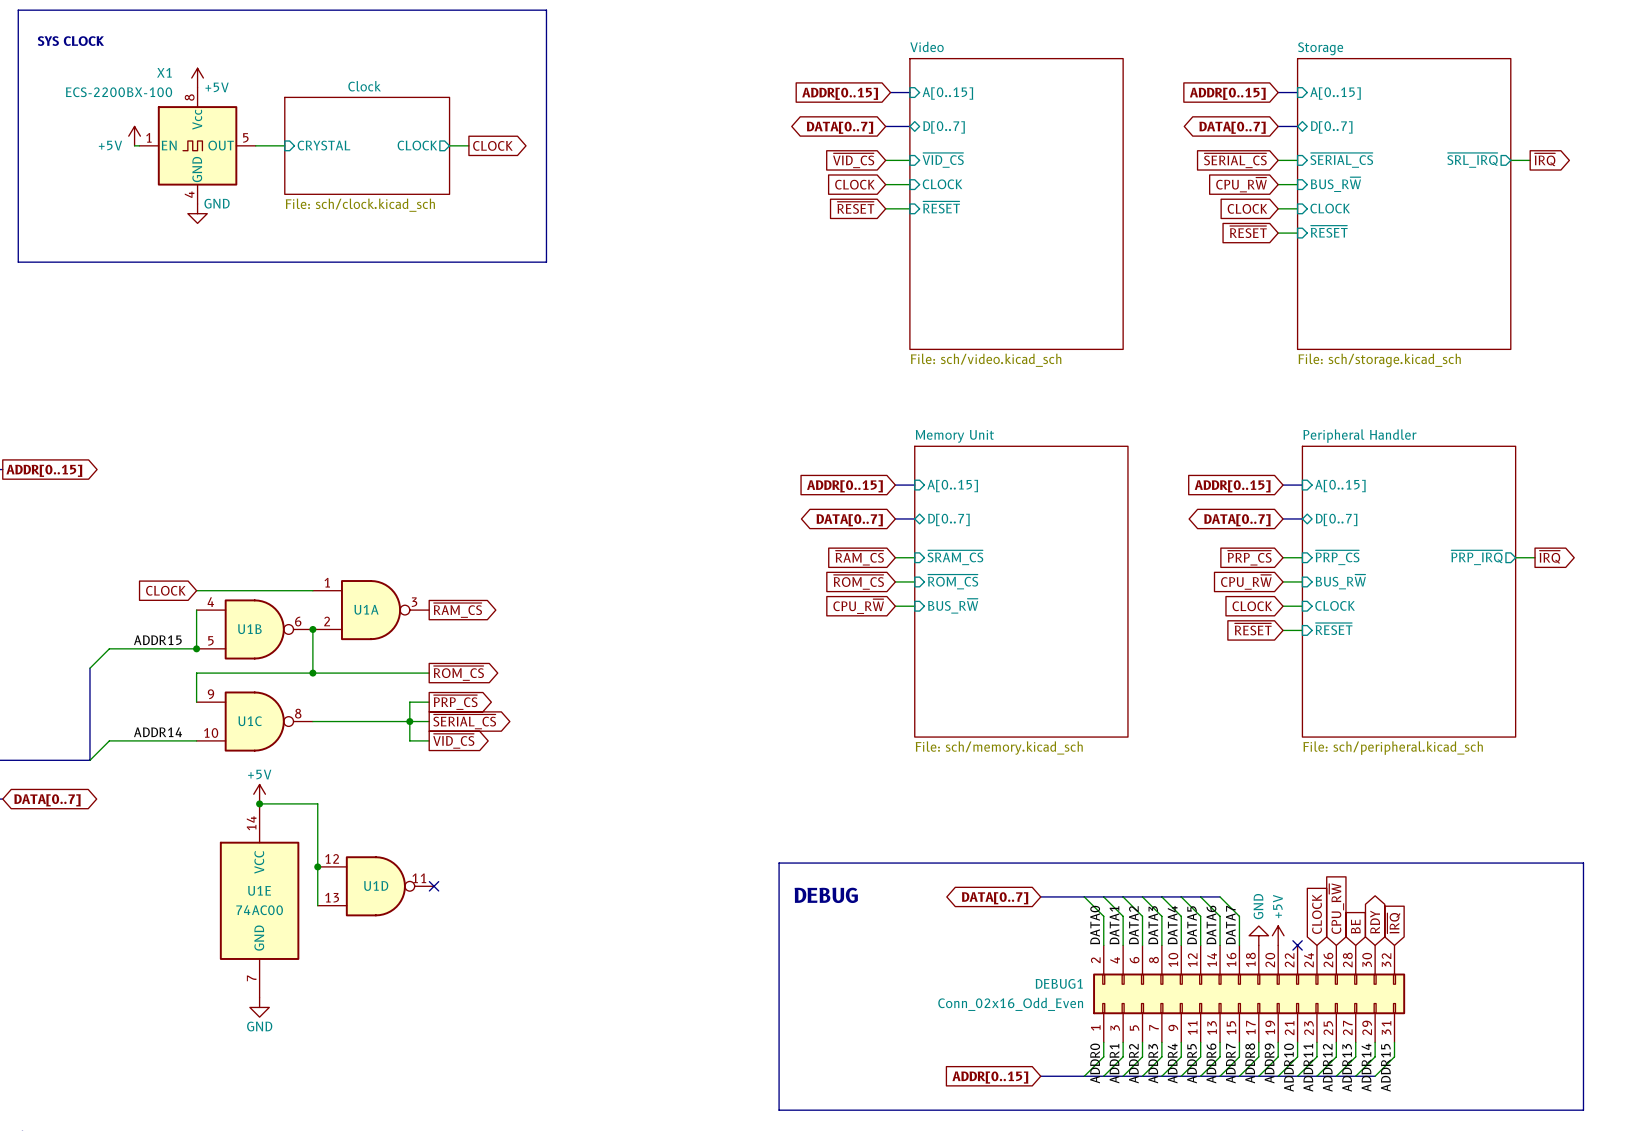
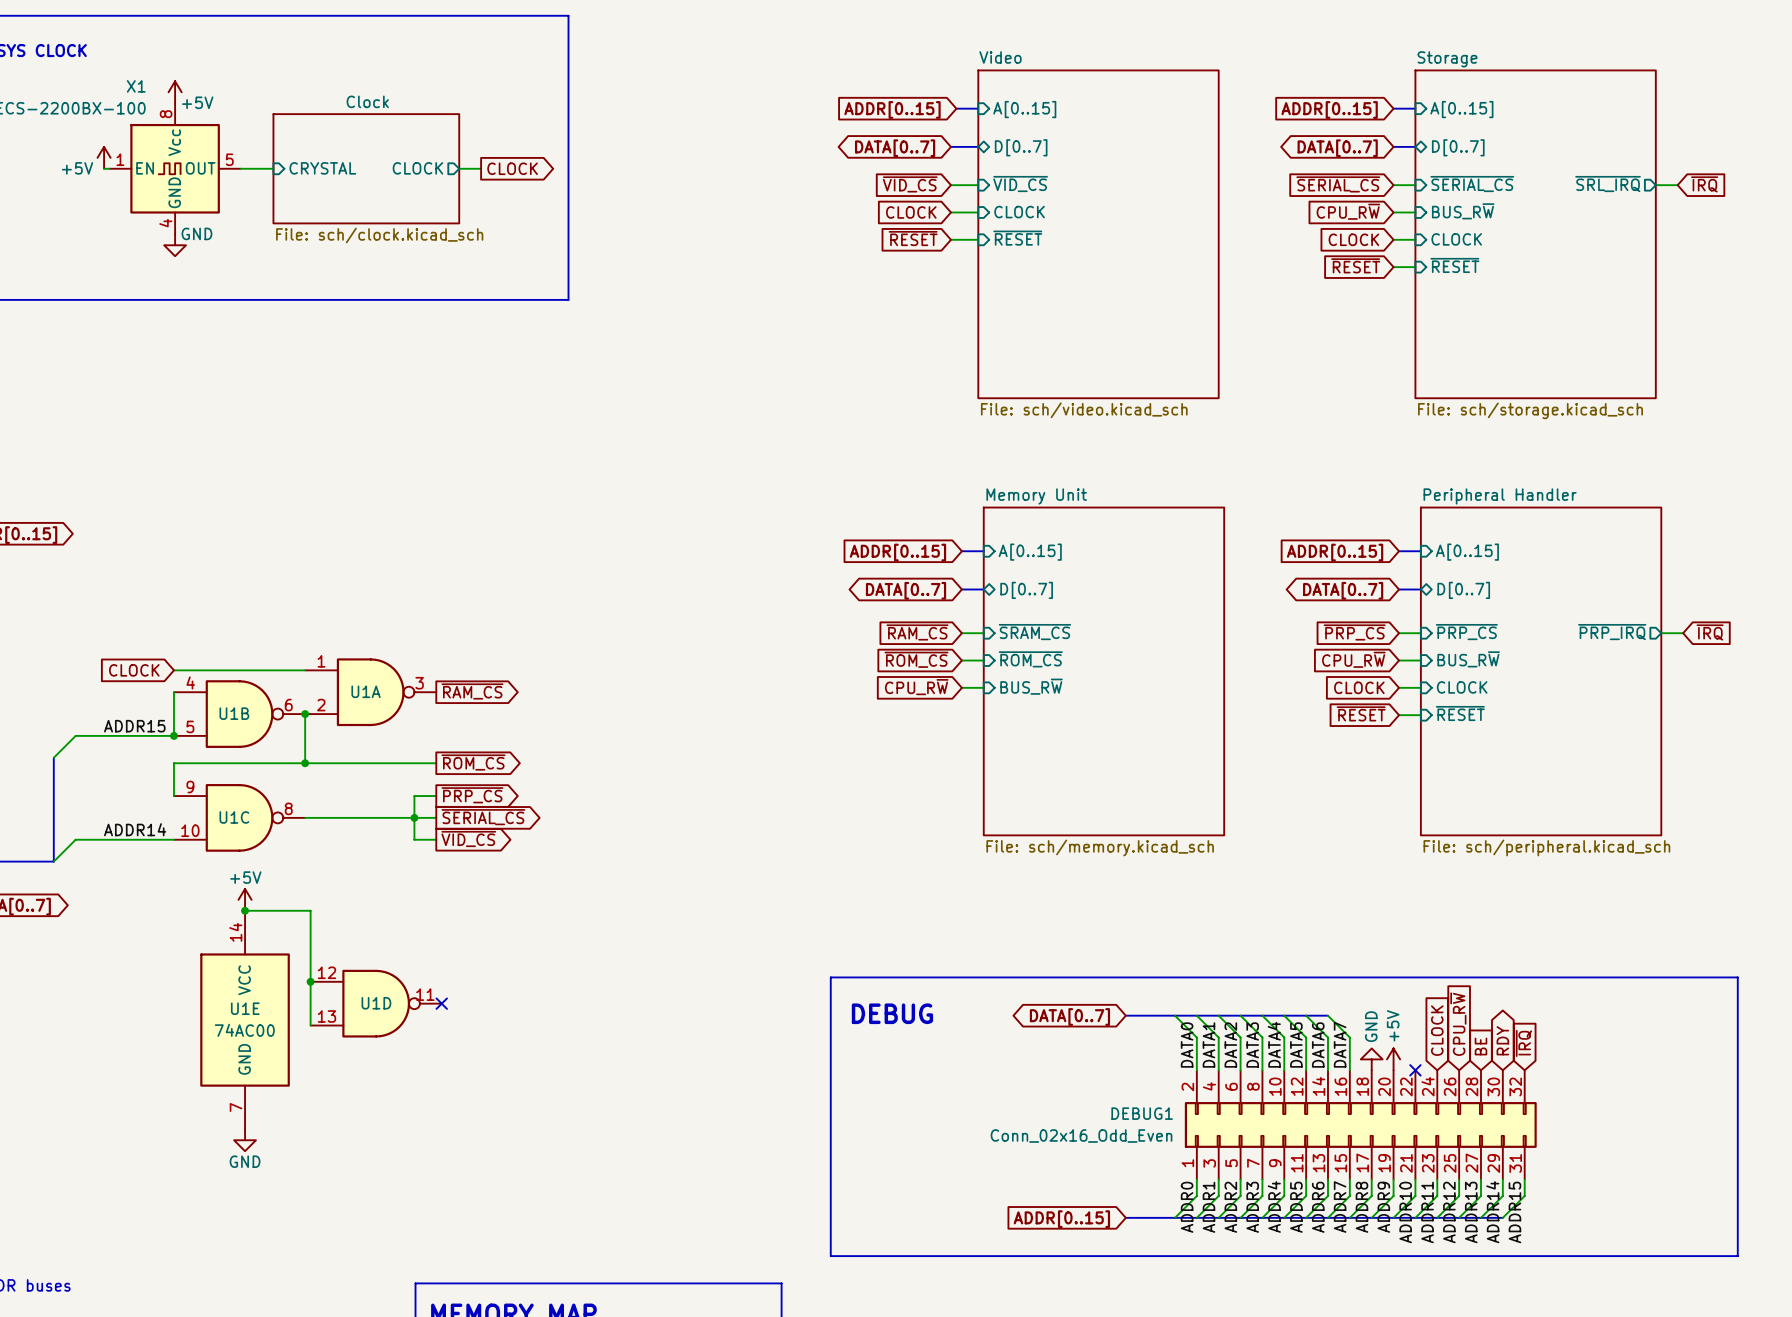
global label shape: output (1545, 159) -> input (1704, 184)
global label shape: output (1549, 557) -> input (1710, 632)

